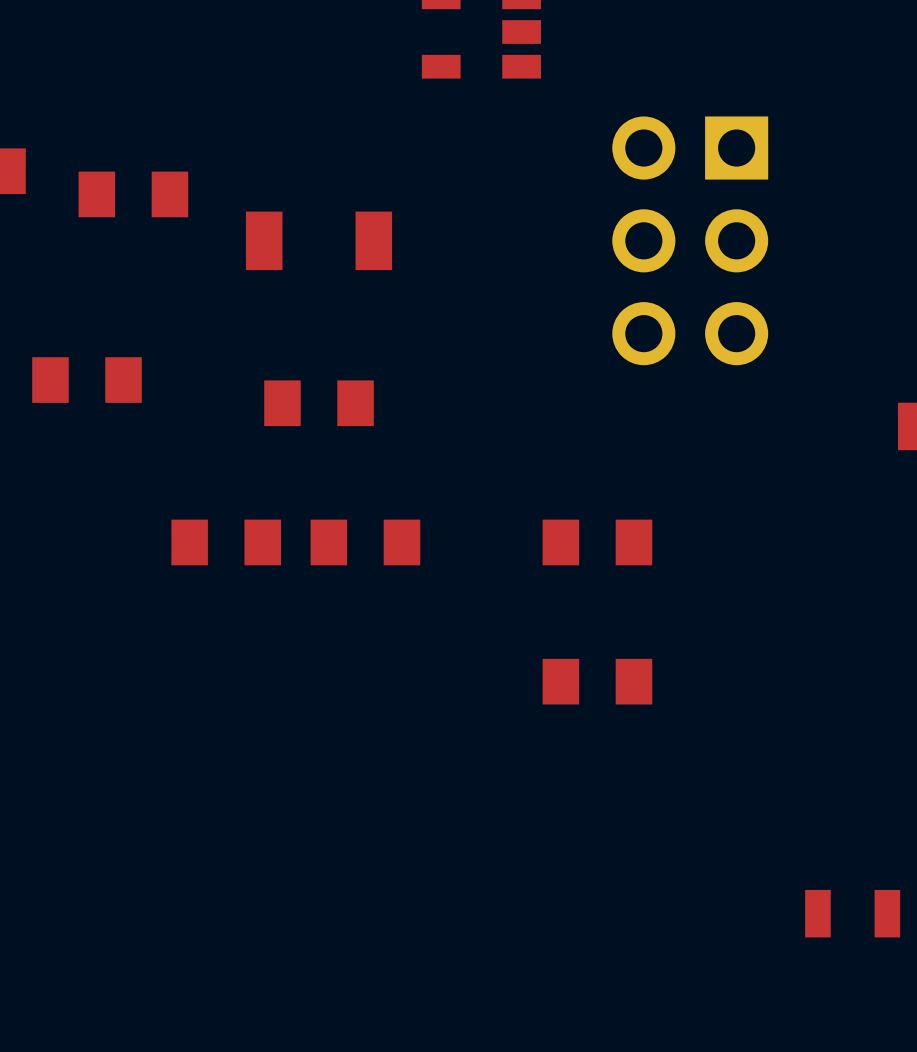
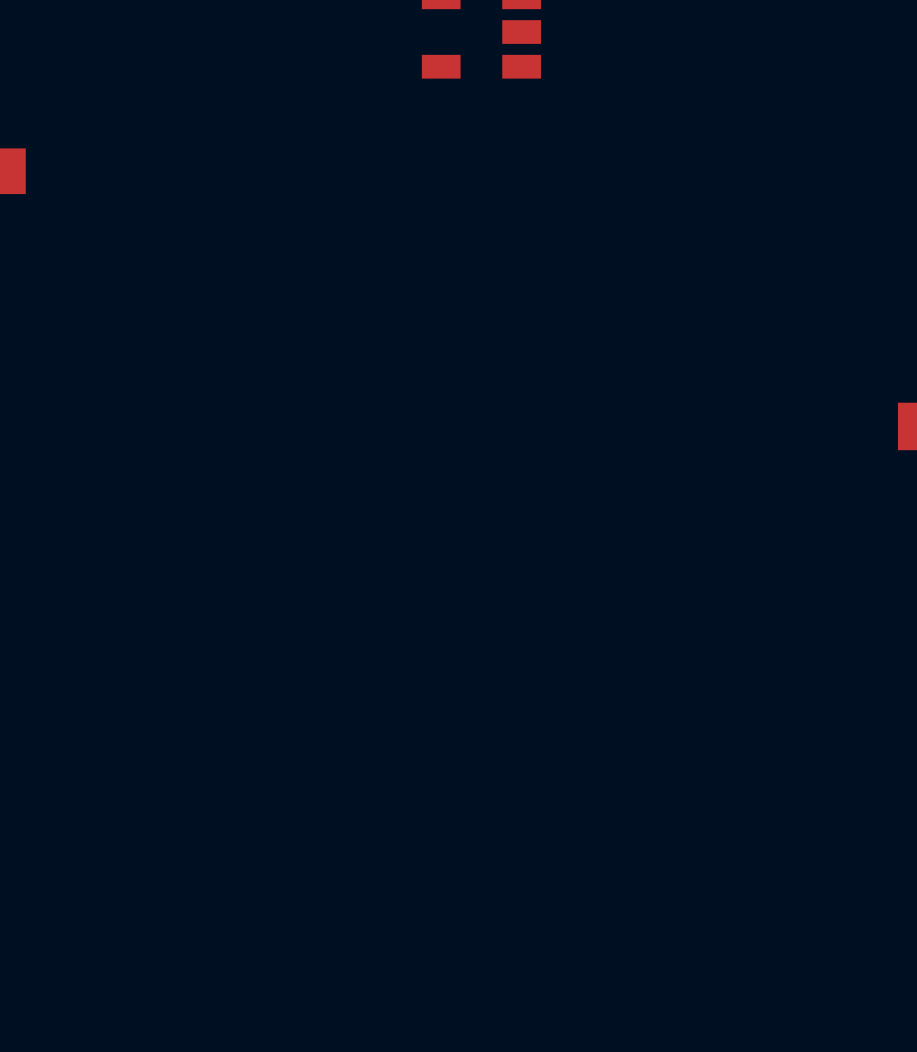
part: (133, 194) -> none
part: (319, 240) -> none
part: (690, 240) -> none
part: (86, 380) -> none
part: (319, 403) -> none
part: (226, 542) -> none
part: (365, 542) -> none
part: (597, 542) -> none
part: (597, 681) -> none
part: (852, 913) -> none

